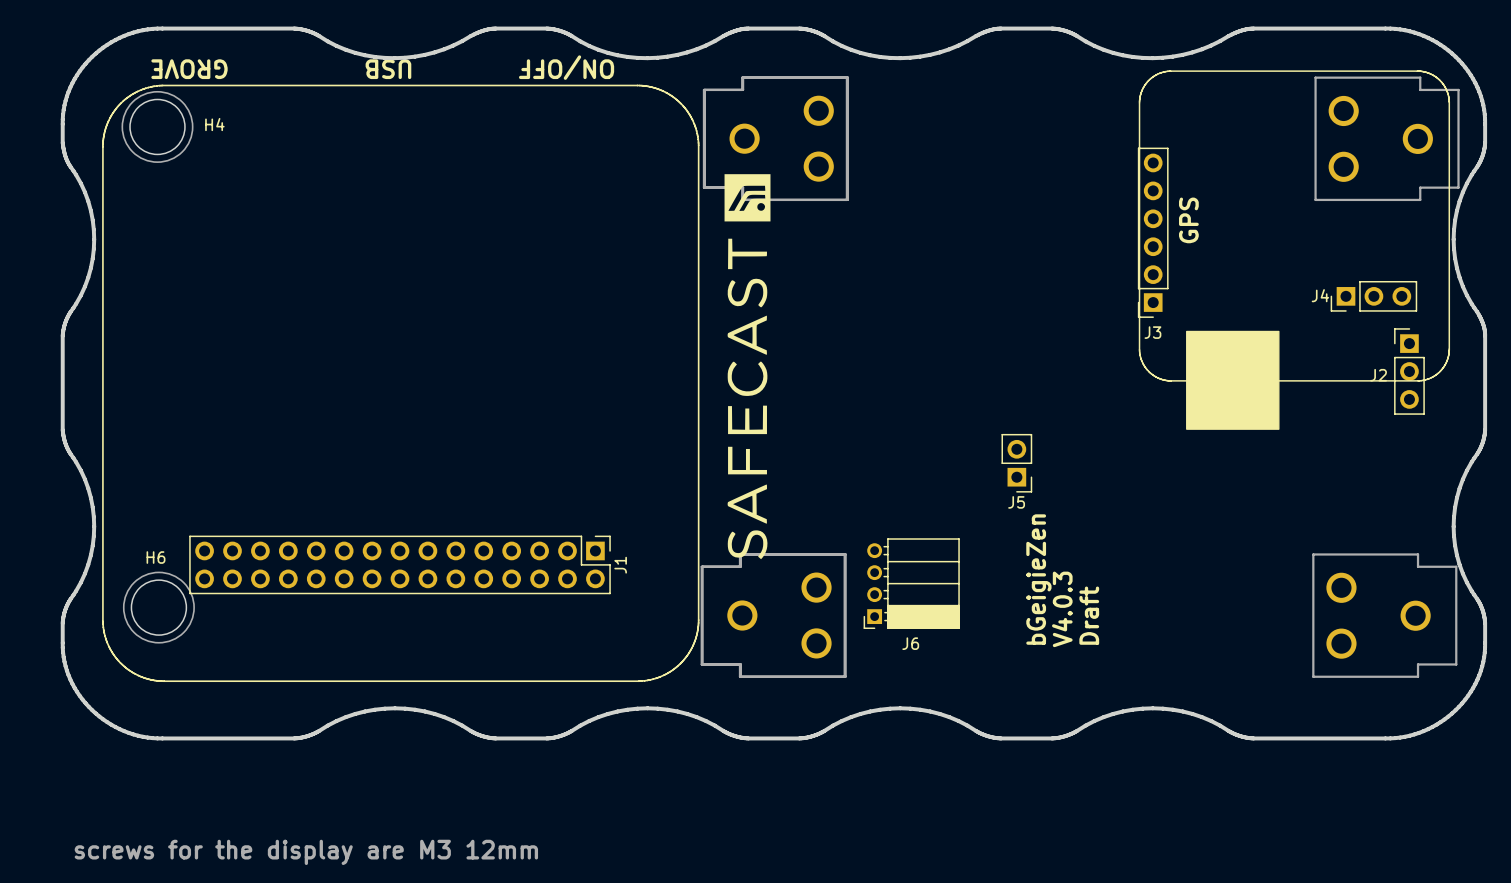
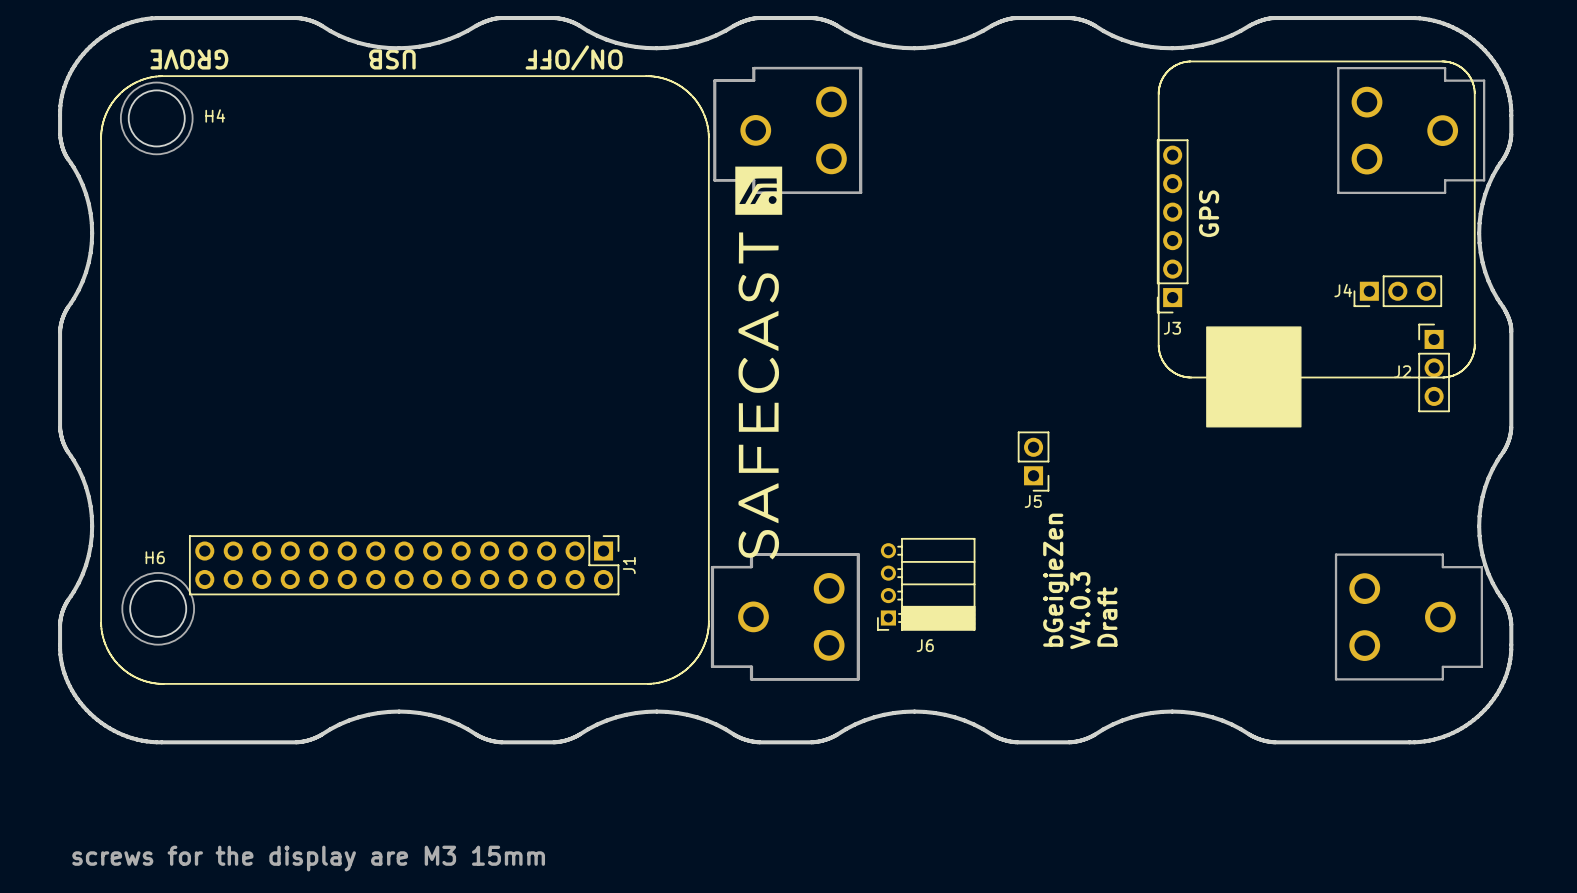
text: screws for the display are M3 12mm (306, 852) -> screws for the display are M3 15mm (308, 858)

